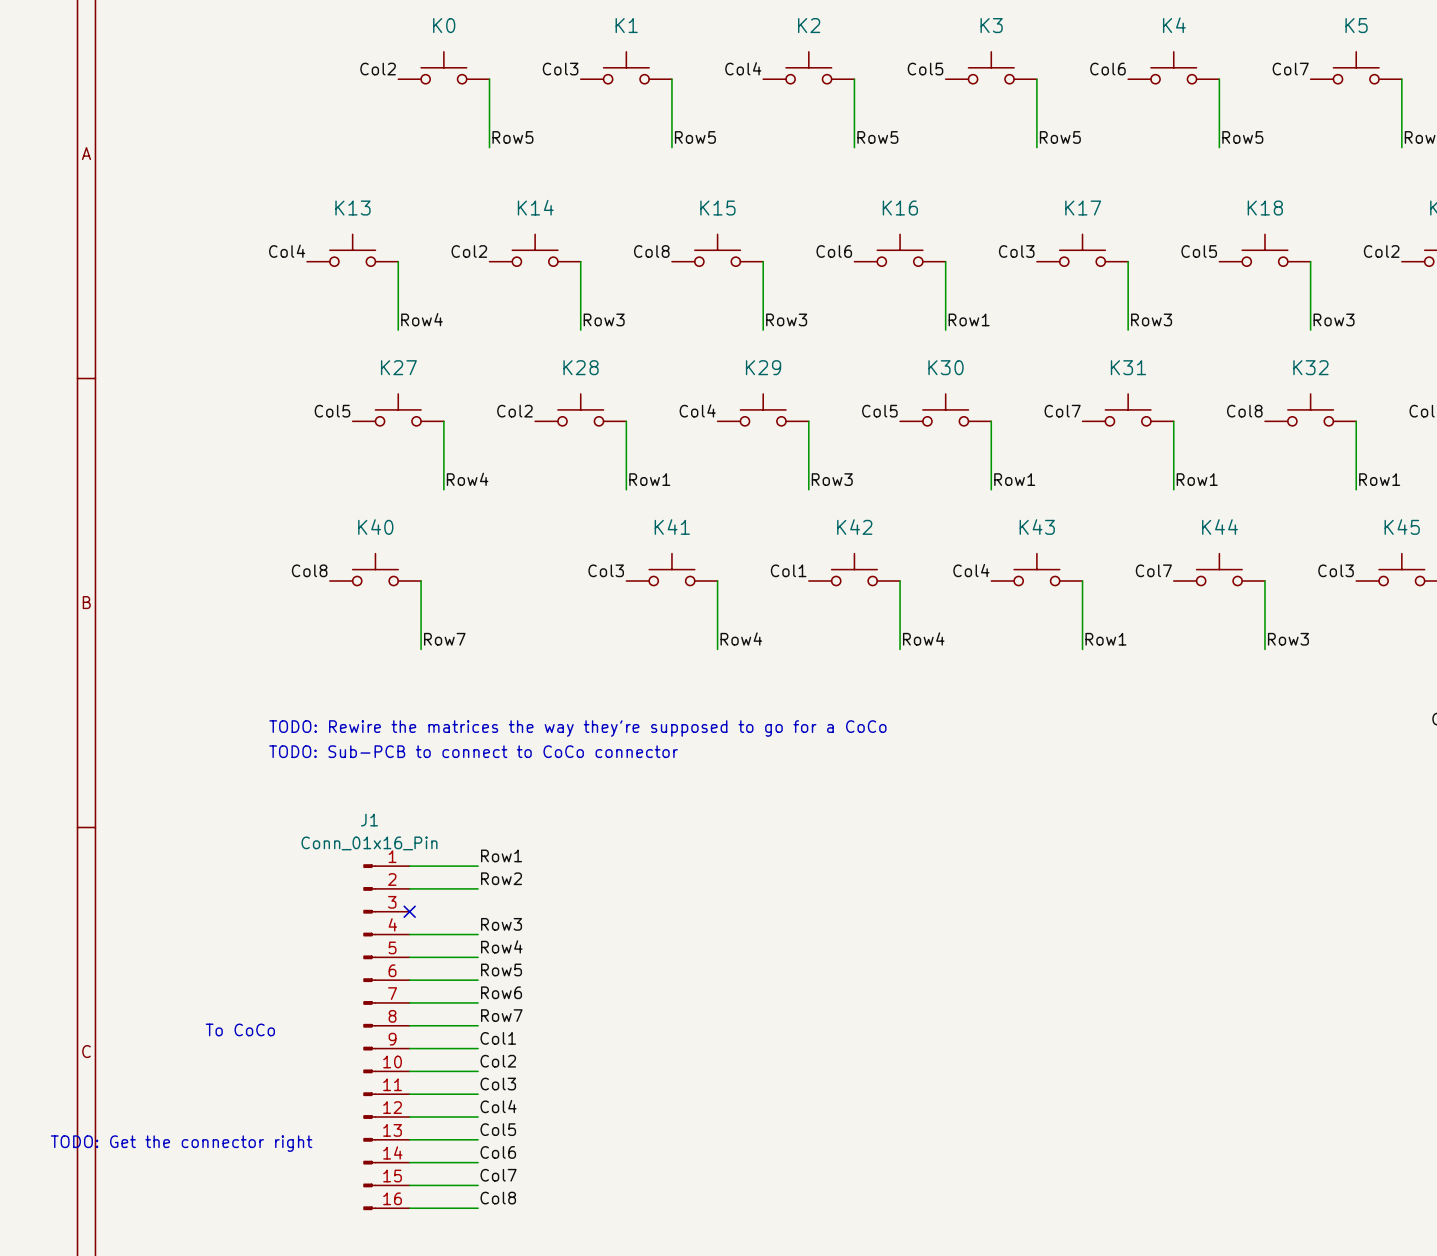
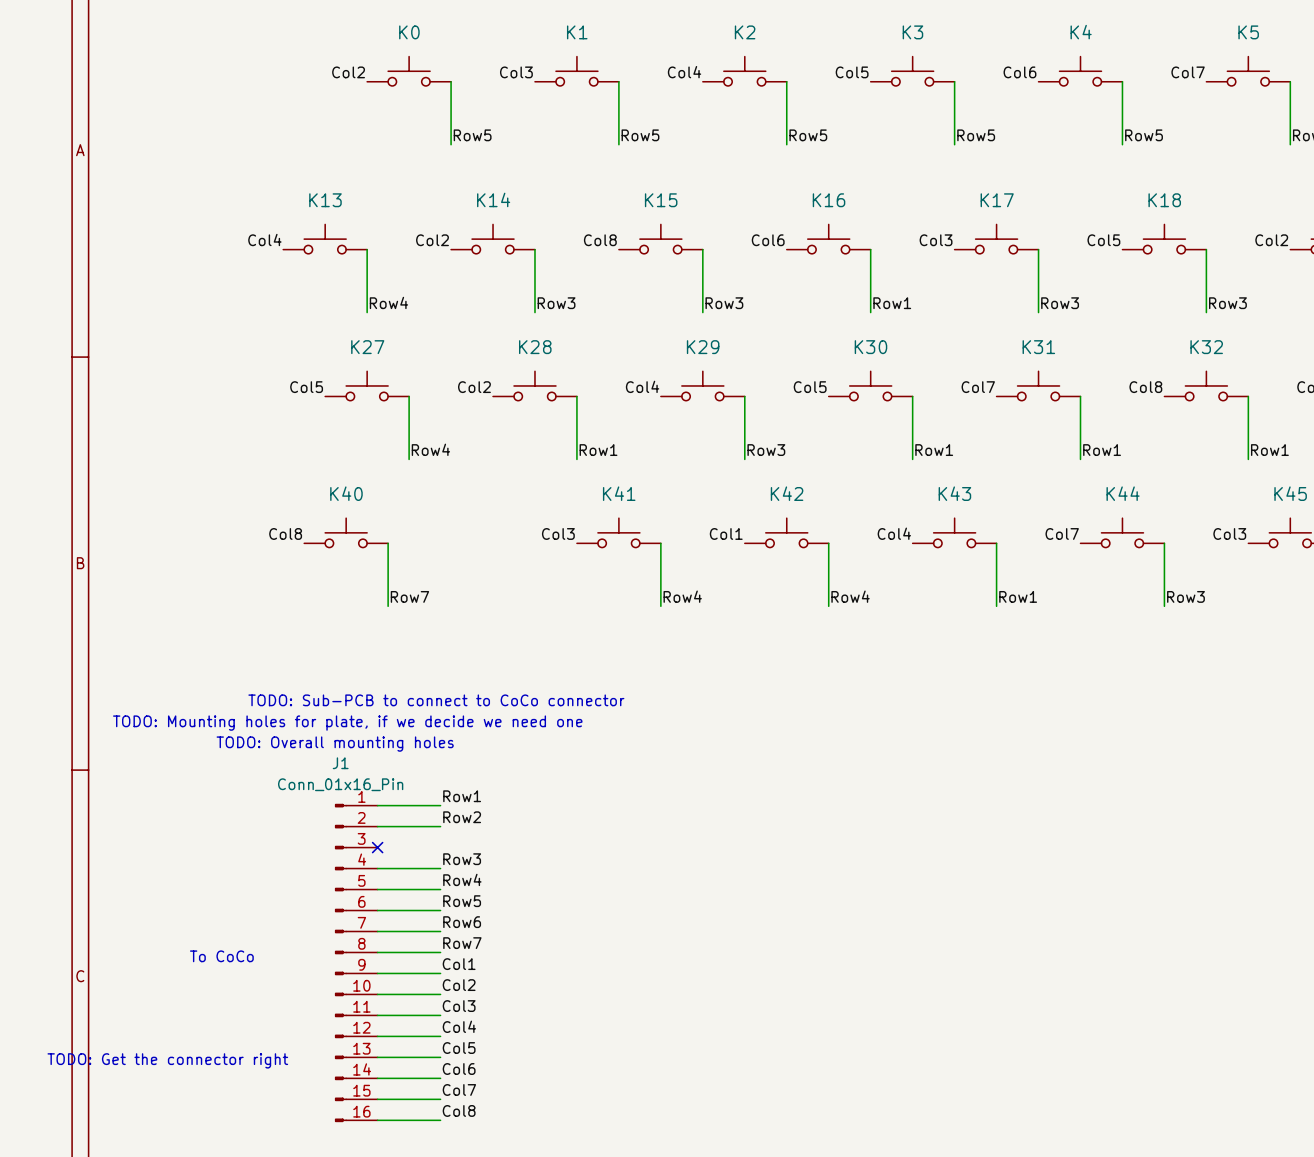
text: TODO: Rewire the matrices the way they're supposed to go for a CoCo (577, 728) -> none
text: none -> TODO: Mounting holes for plate, if we decide we need one (347, 723)
text: none -> TODO: Overall mounting holes (335, 744)

